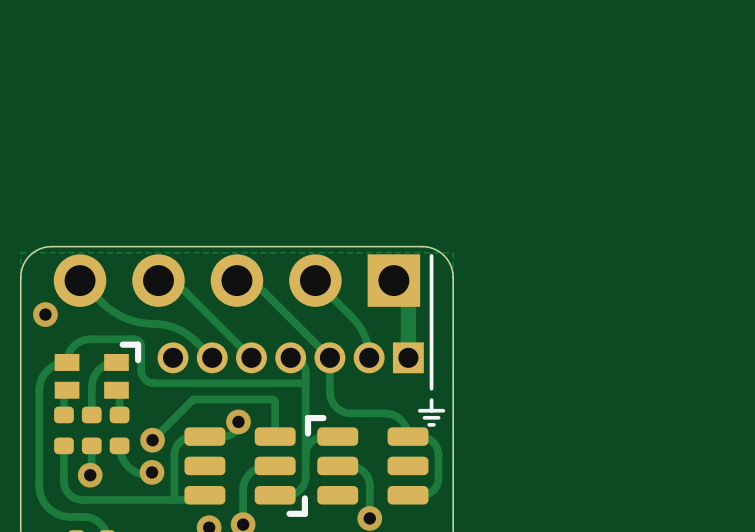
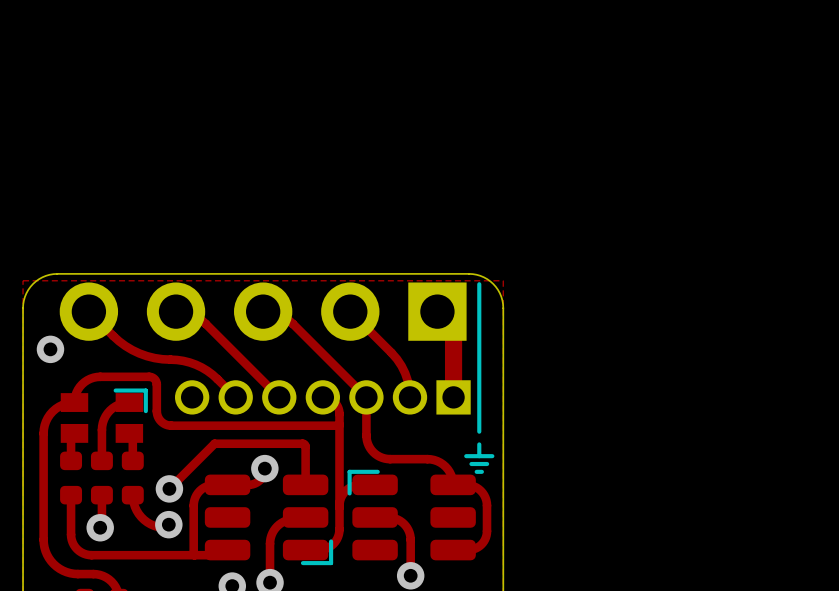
part footprint: [54, 341, 142, 399] -> [60, 388, 148, 443]
part footprint: [304, 414, 429, 505] -> [347, 469, 476, 561]
part footprint: [184, 427, 309, 517] -> [204, 474, 334, 566]

